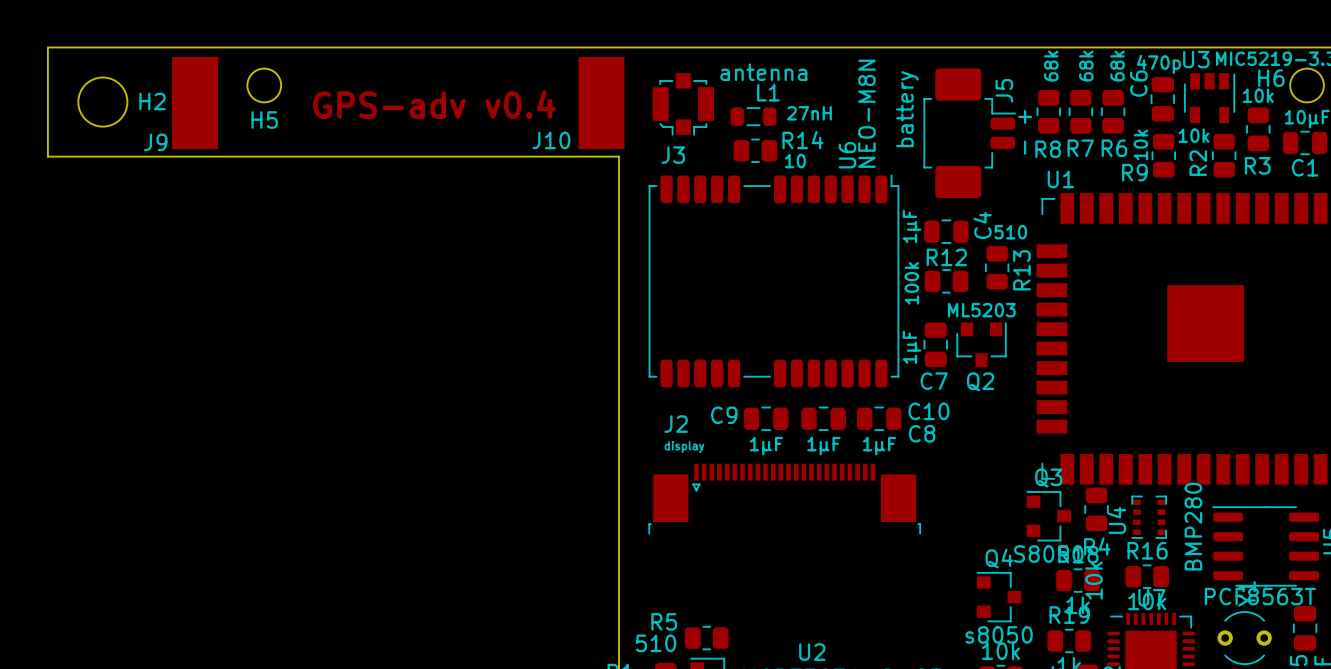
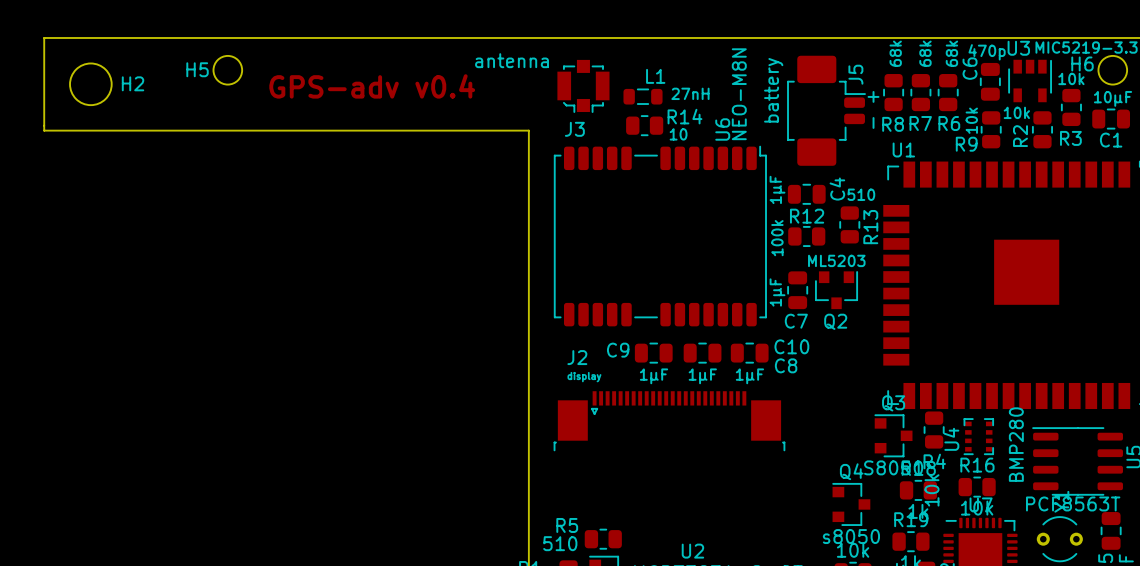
J3 value position: antenna (763, 72) -> antenna (512, 60)
J9: (195, 103) -> none
J10: (601, 103) -> none
H5 name position: H5 (264, 120) -> H5 (197, 69)

